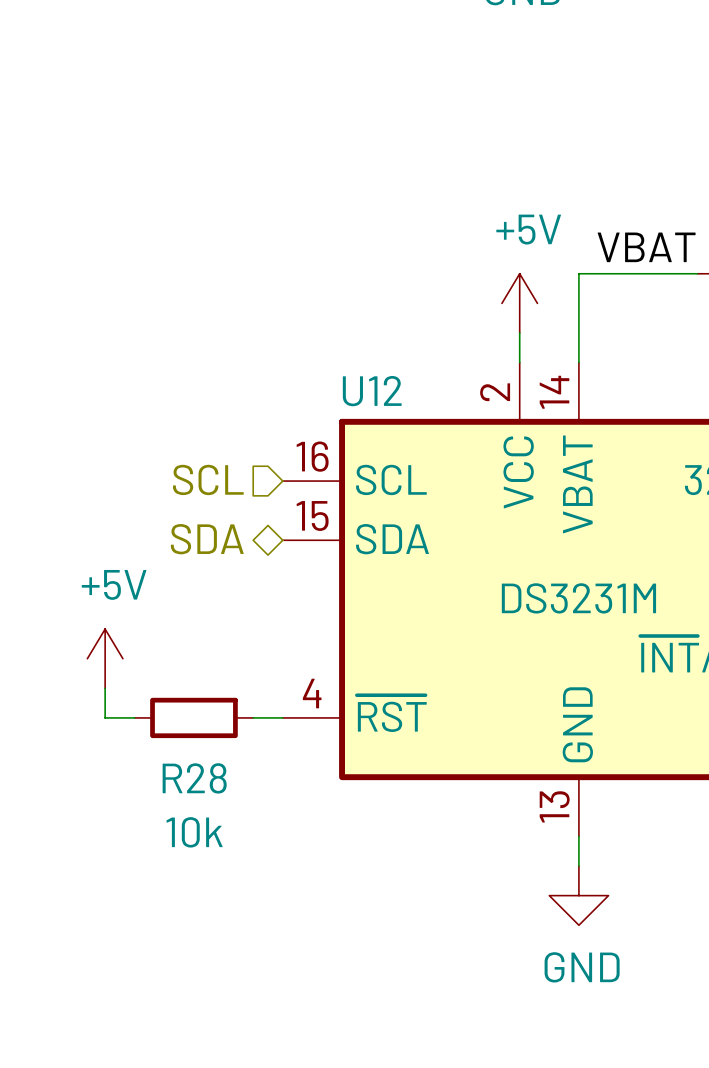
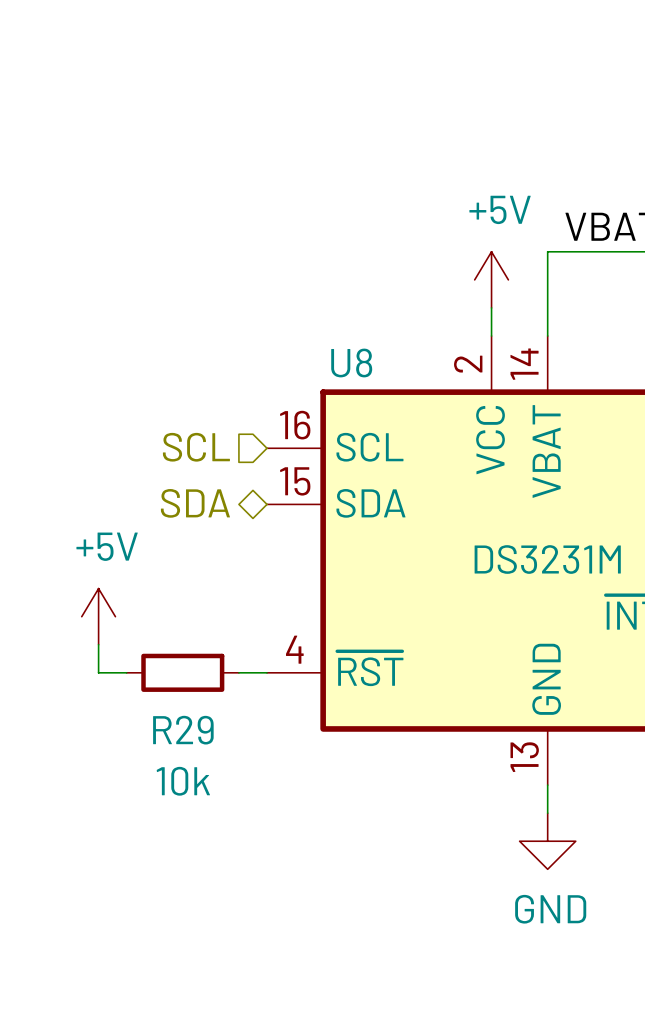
U12 name: U12 (372, 391) -> U8 (351, 362)
R28 name: R28 (194, 778) -> R29 (183, 730)

